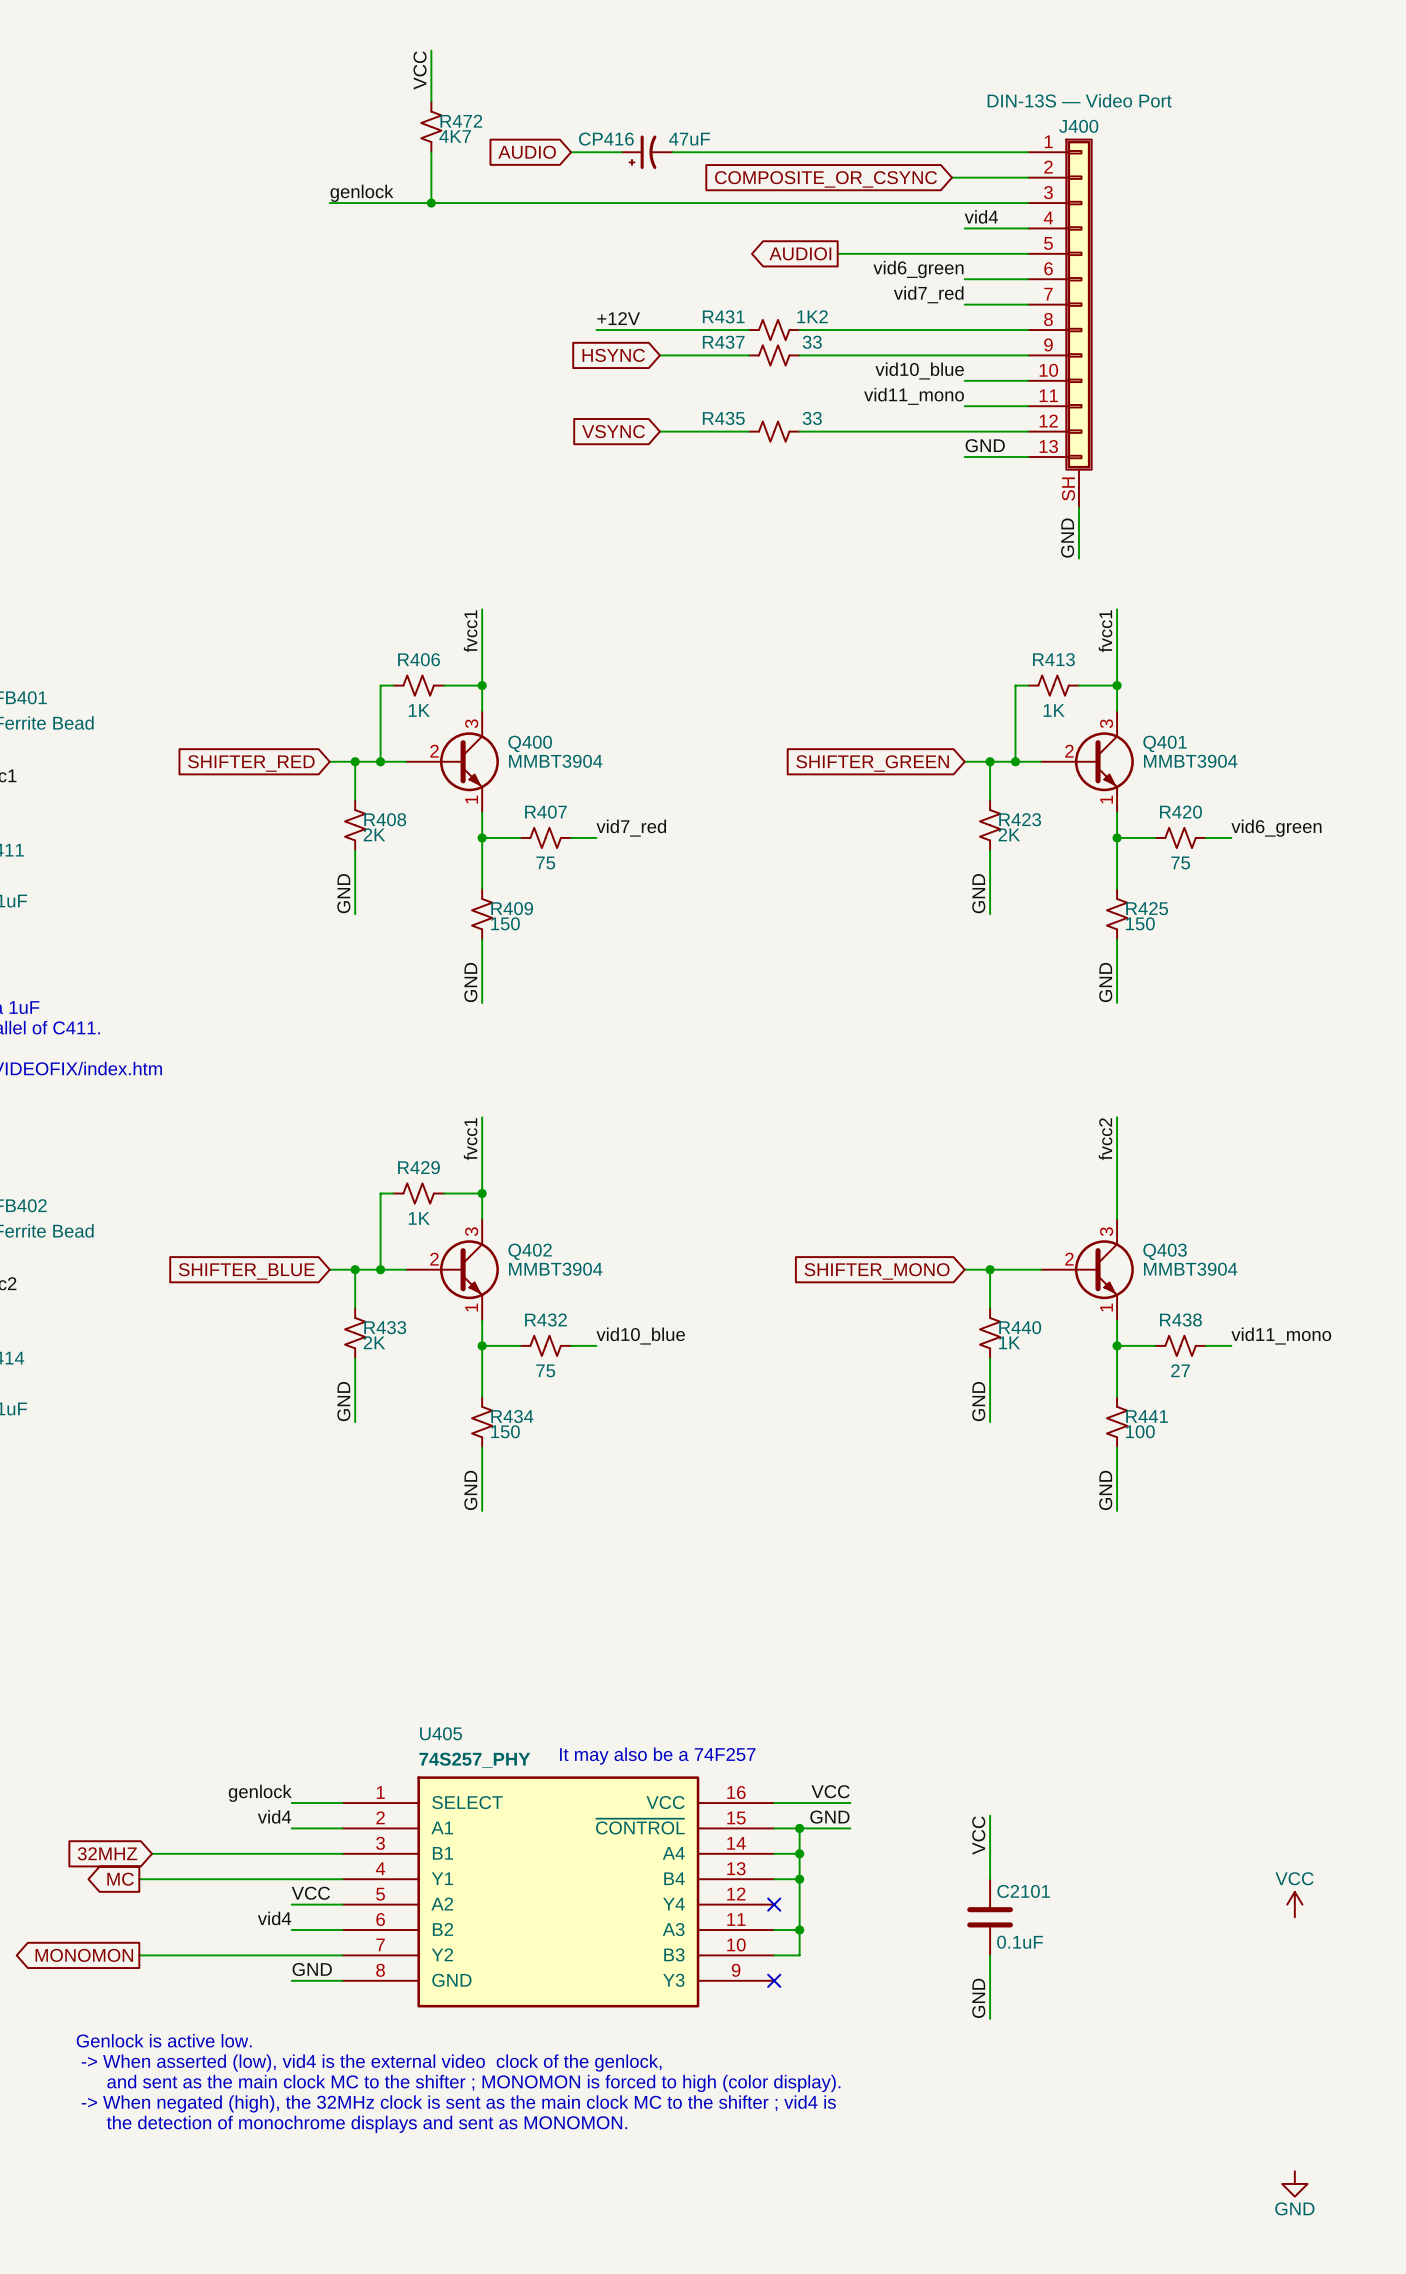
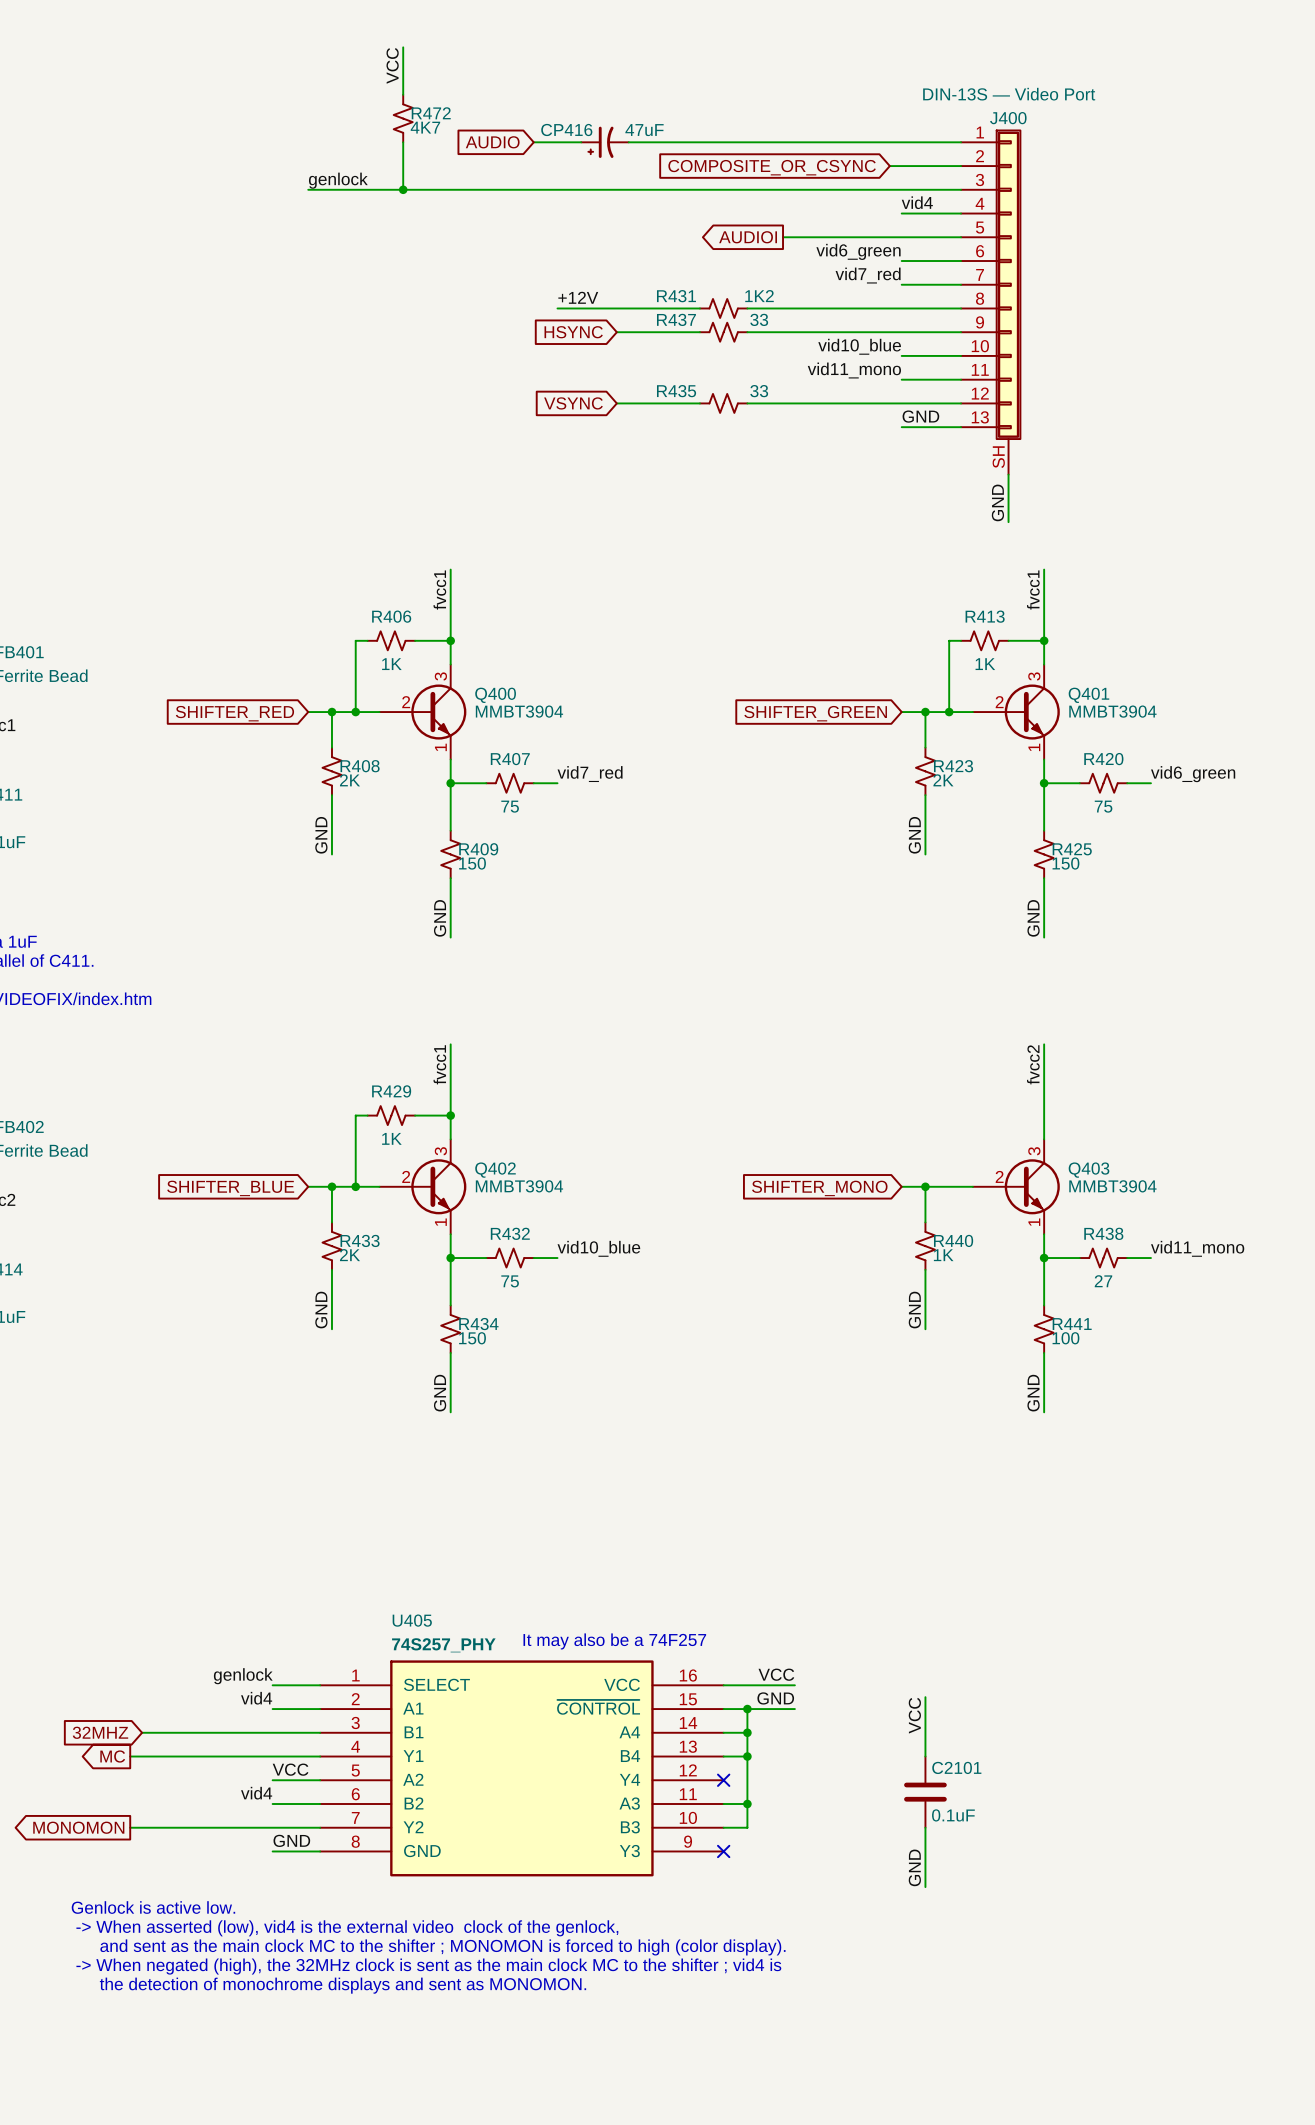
power symbol: VCC (1294, 1904) -> none
power symbol: GND (1294, 2183) -> none

